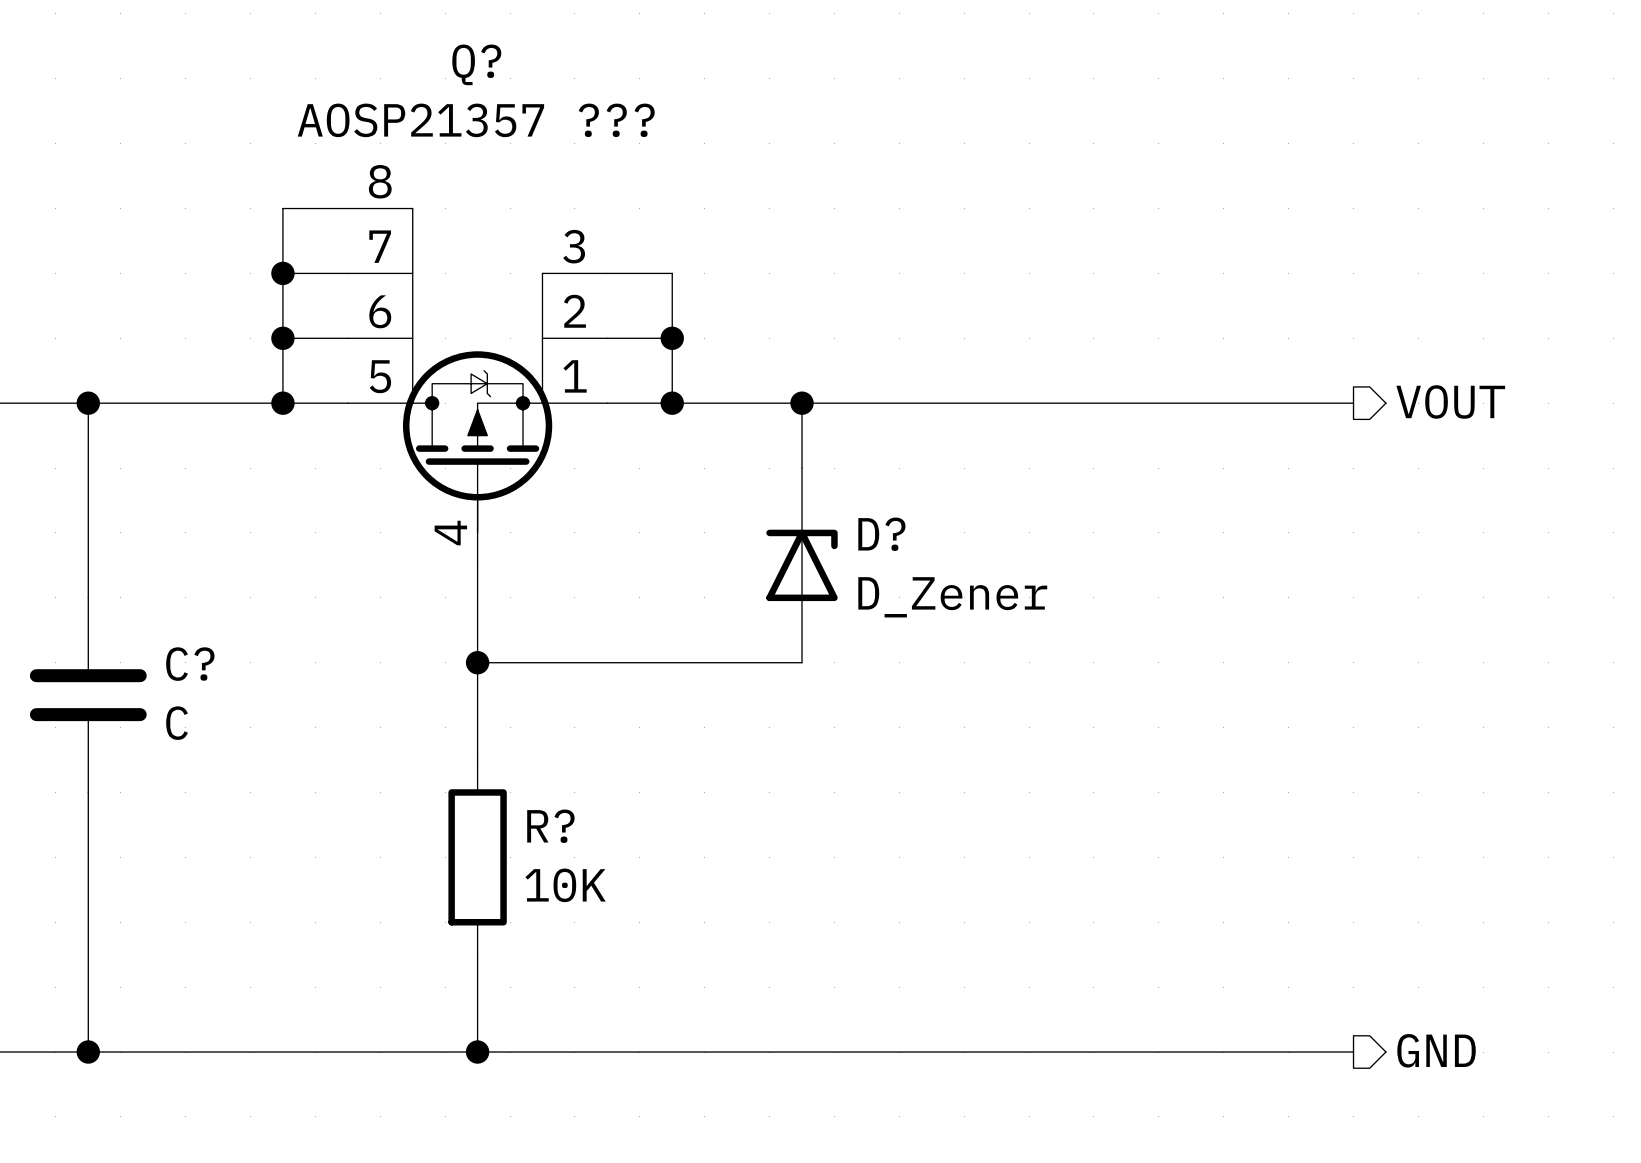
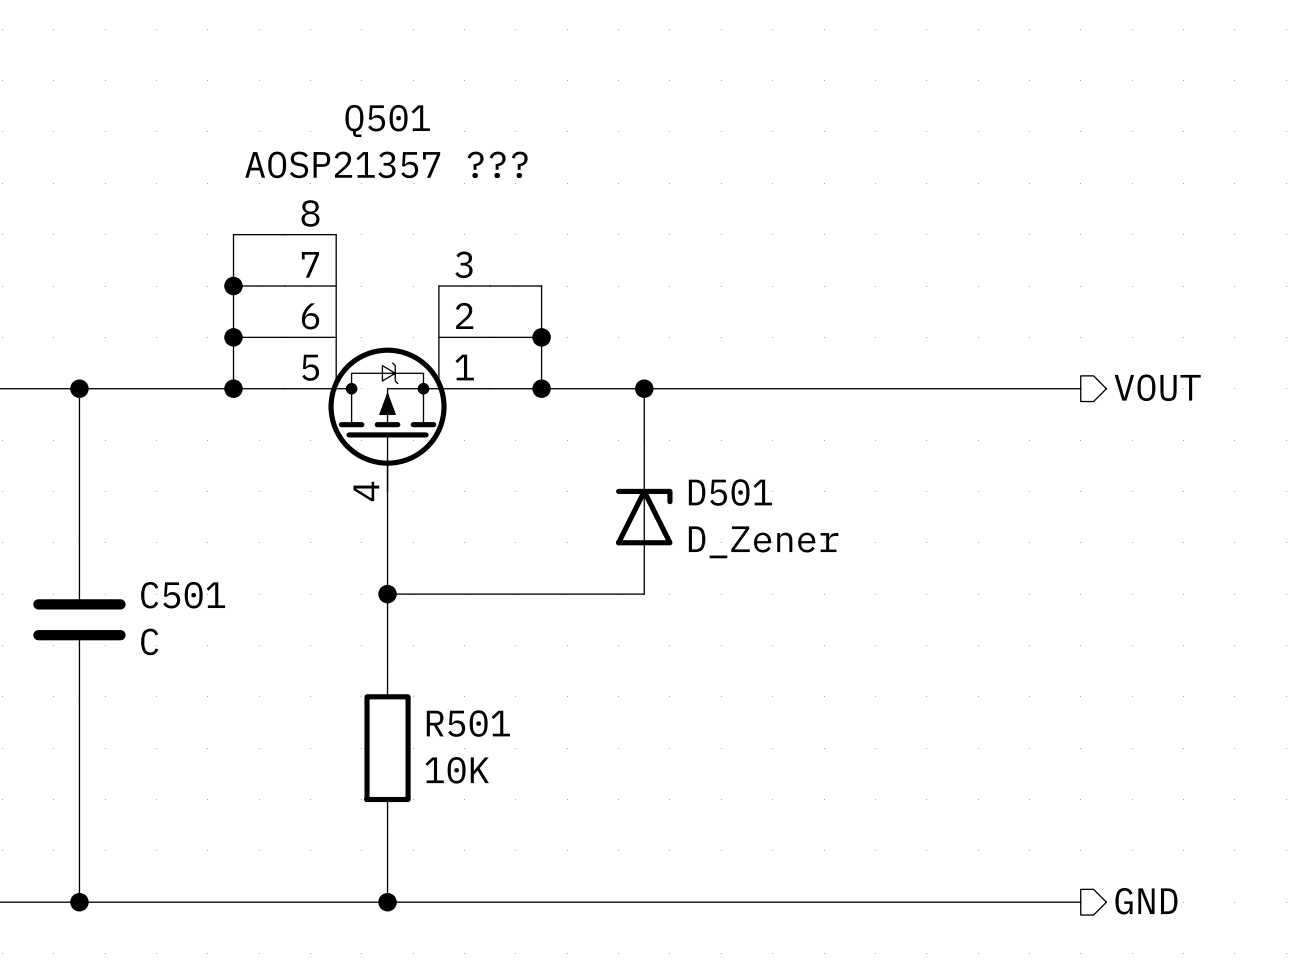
Q? name: Q? (476, 64) -> Q501 (387, 120)
D? name: D? (881, 534) -> D501 (730, 492)
C? name: C? (190, 664) -> C501 (183, 595)
R? name: R? (550, 826) -> R501 (468, 723)

